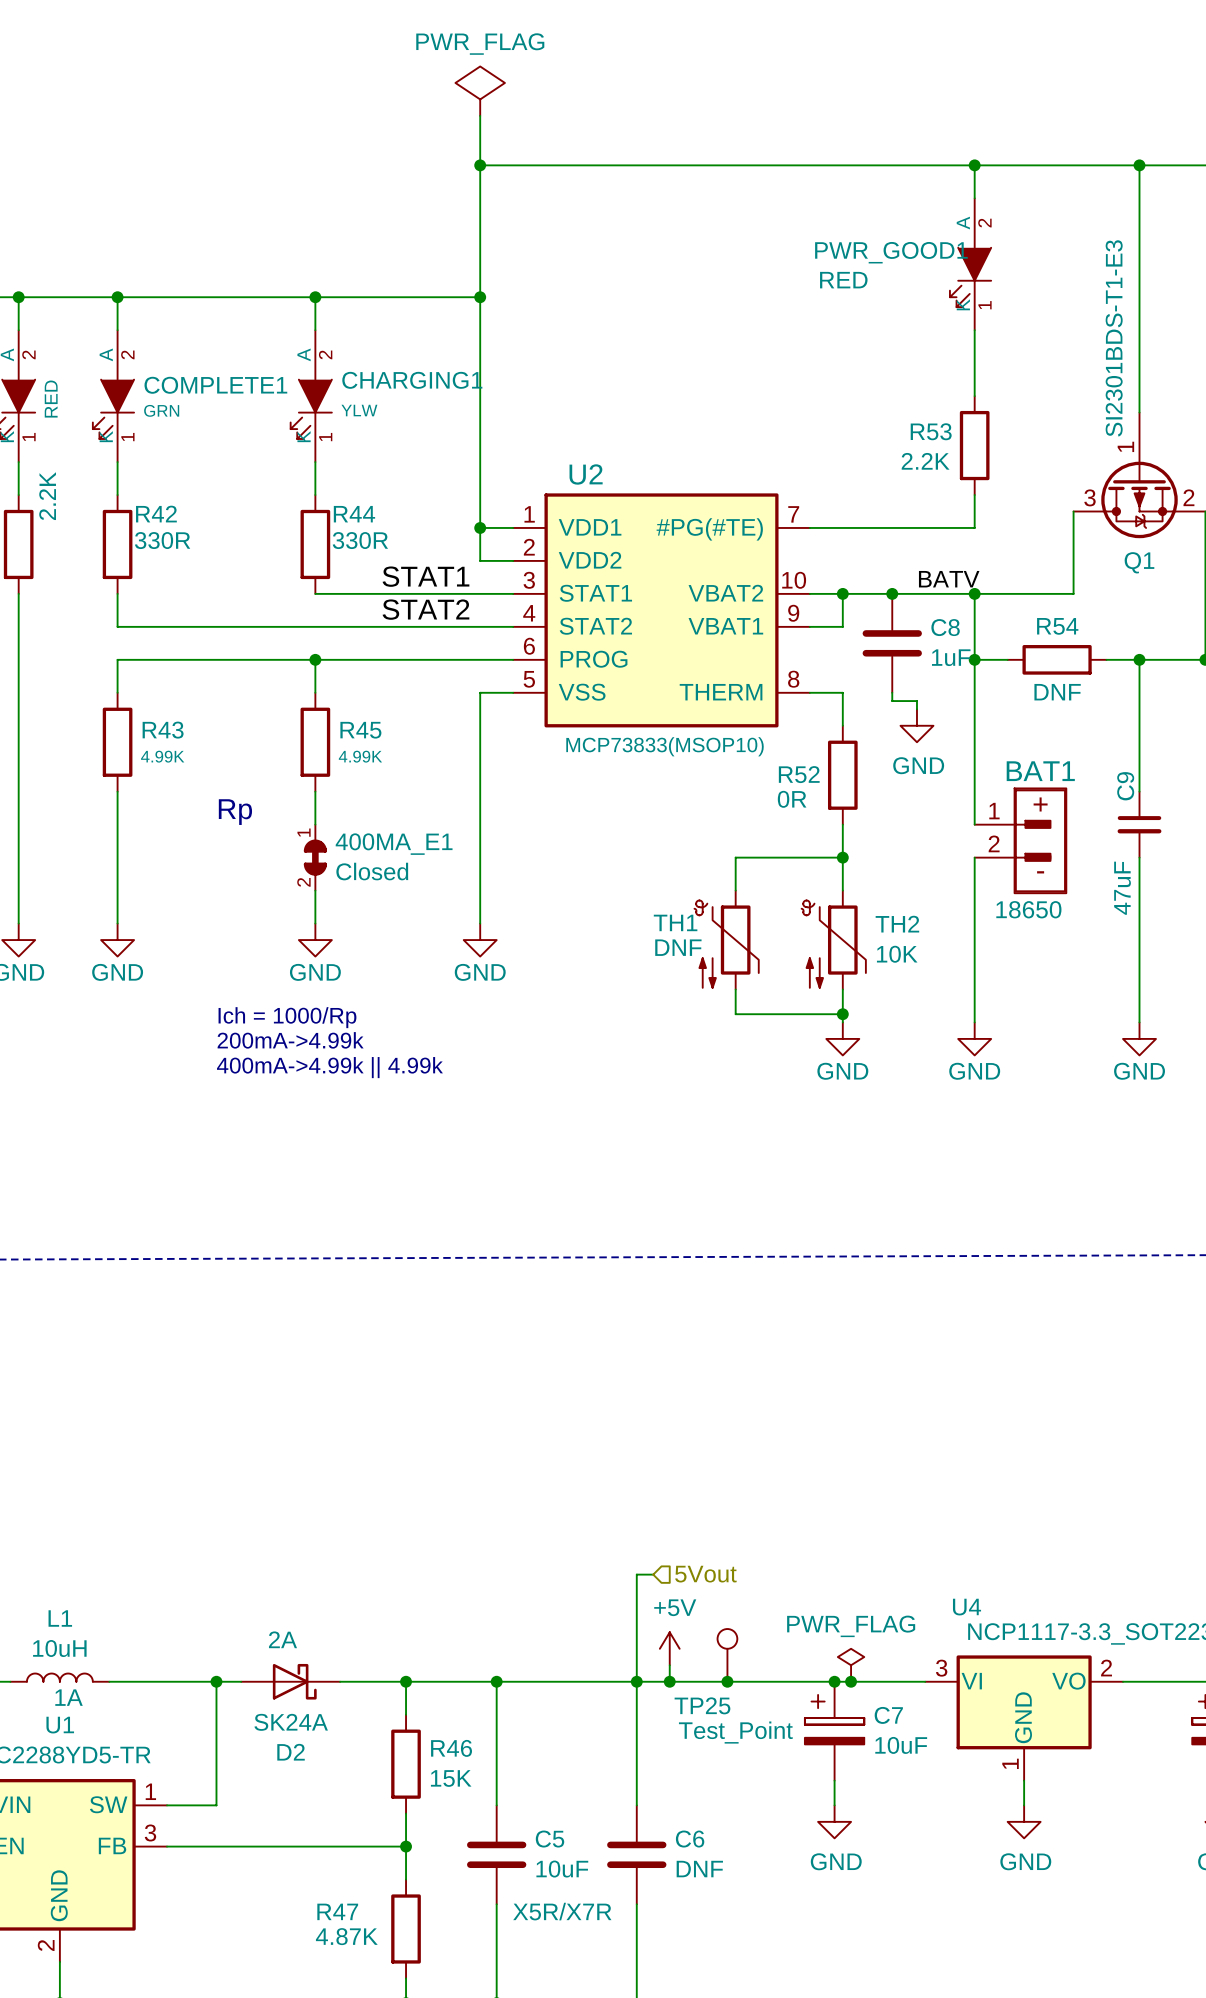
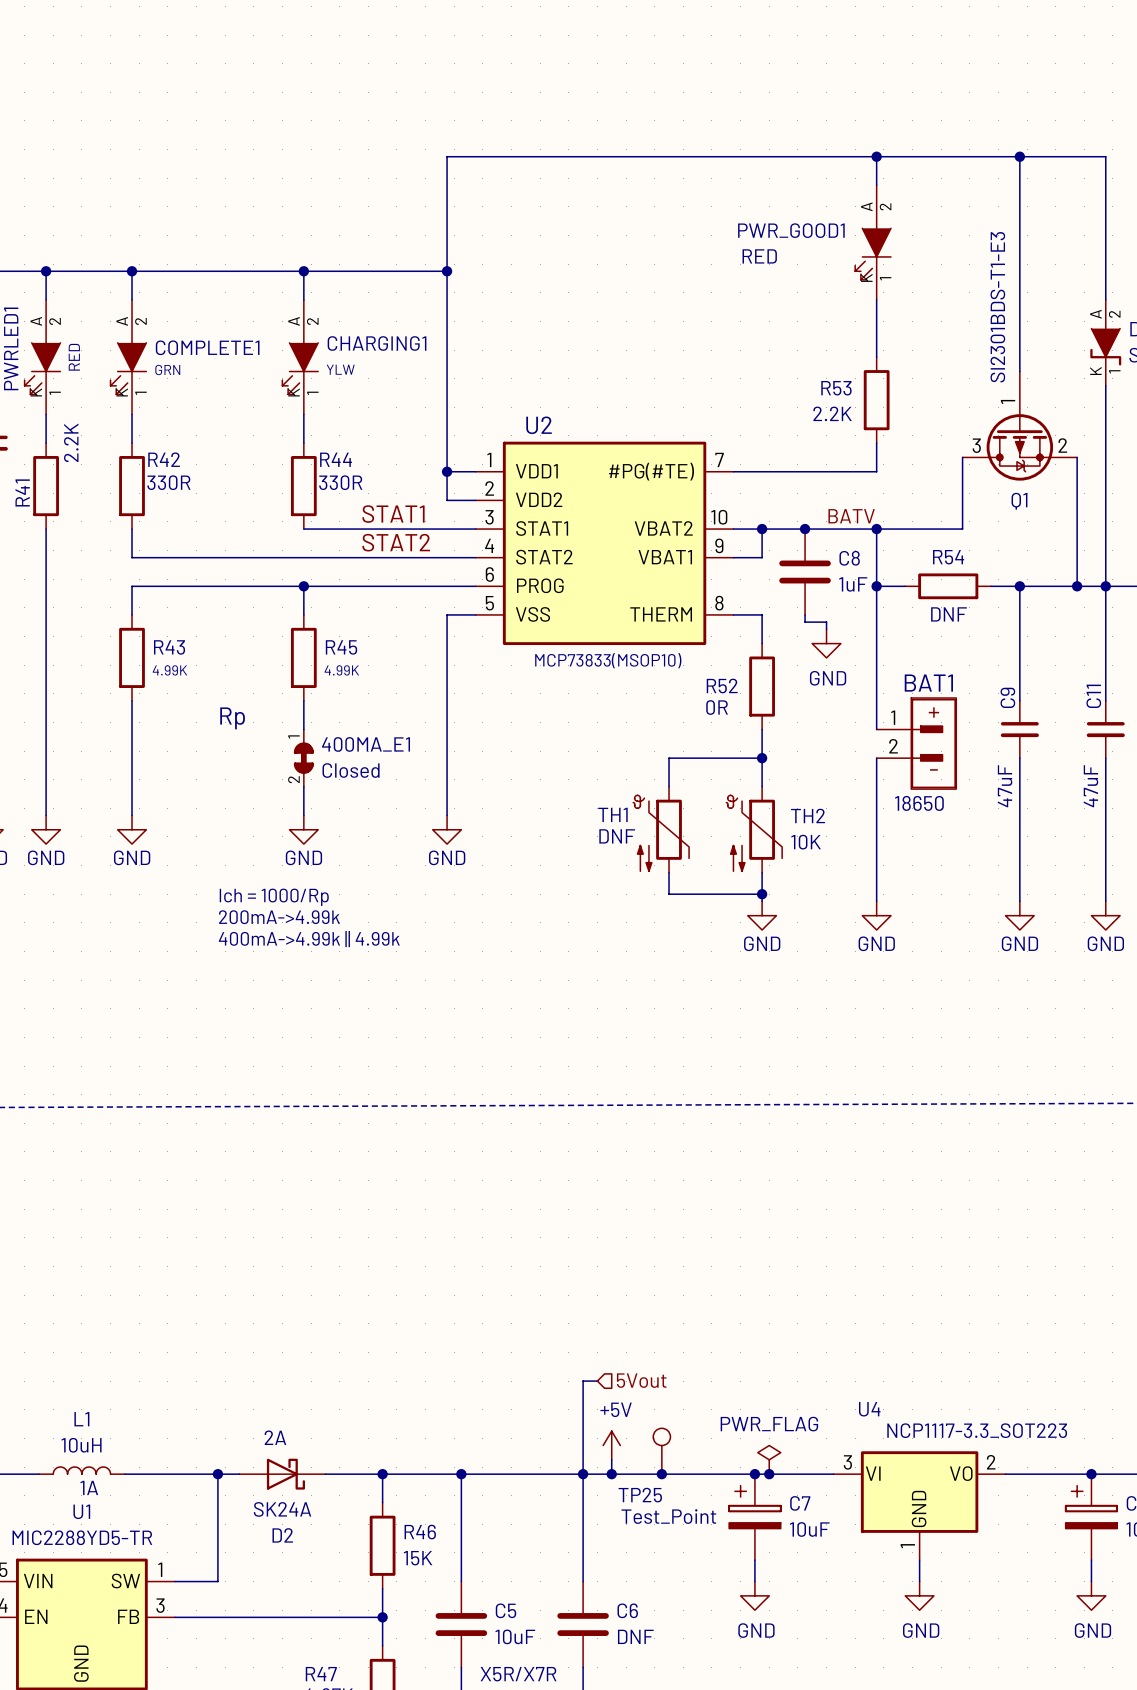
power symbol: PWR_FLAG (480, 91) -> none
wire: (480, 115) (480, 165) -> none
junction: (480, 165) -> none

